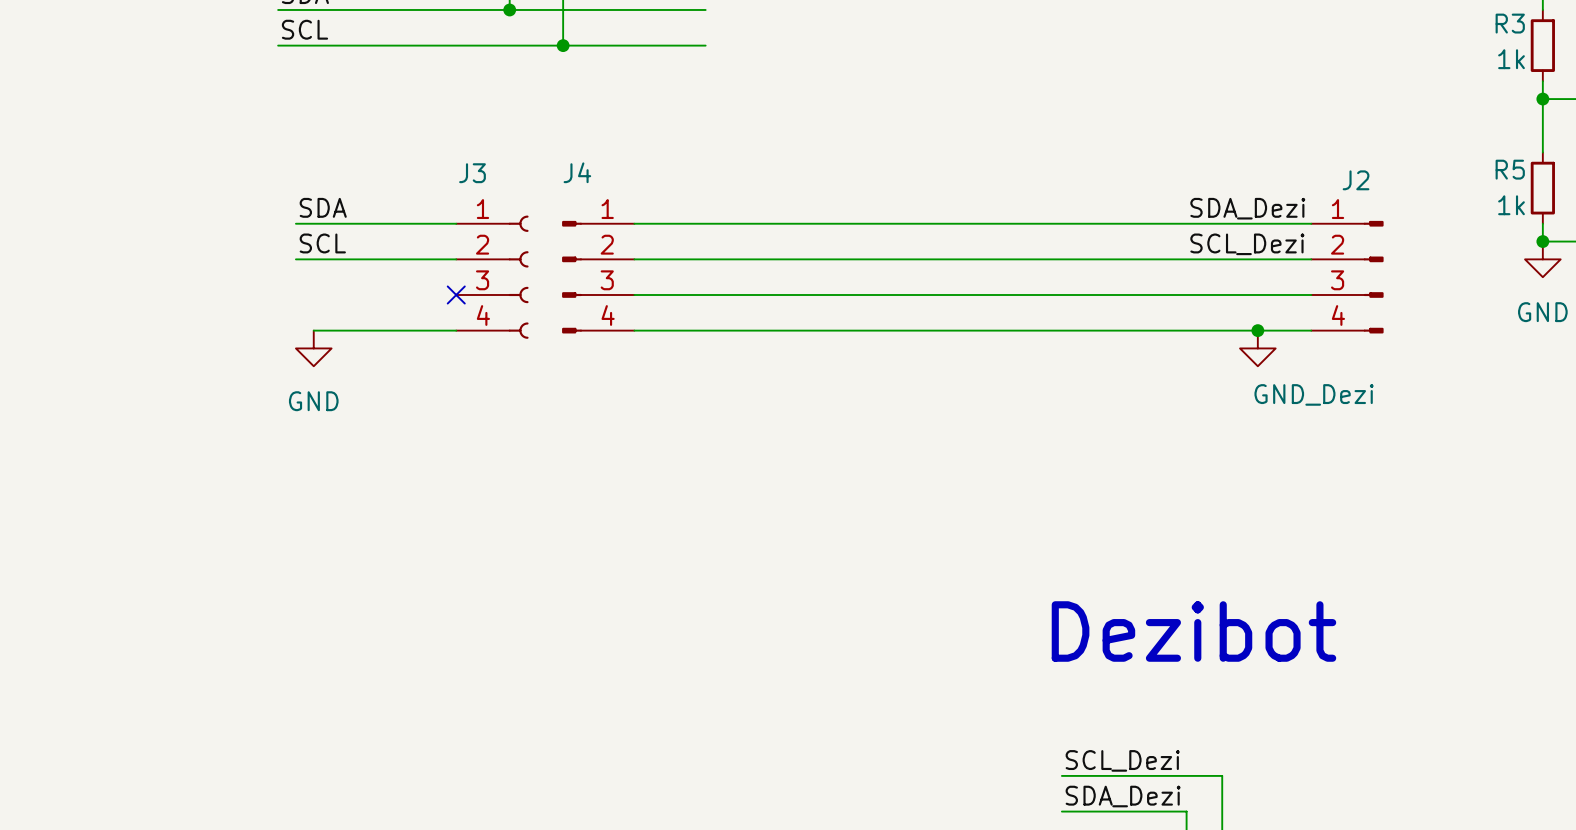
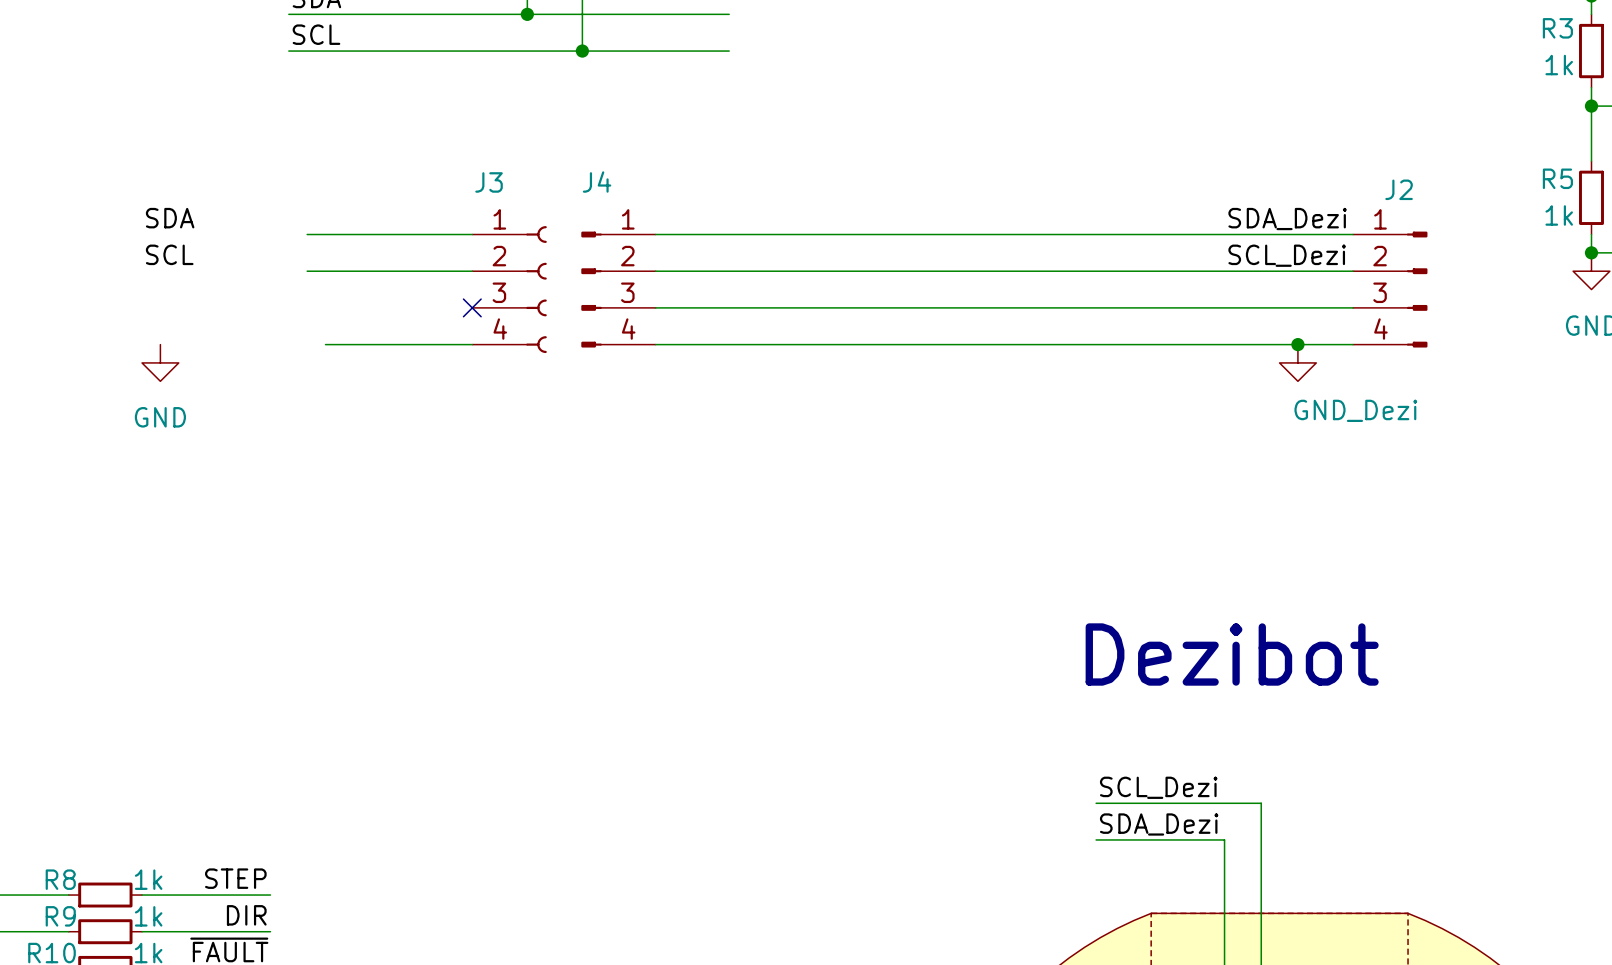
label position: SDA (323, 207) -> SDA (170, 218)
label position: SCL (322, 243) -> SCL (169, 254)
power symbol position: GND (313, 348) -> GND (160, 362)

